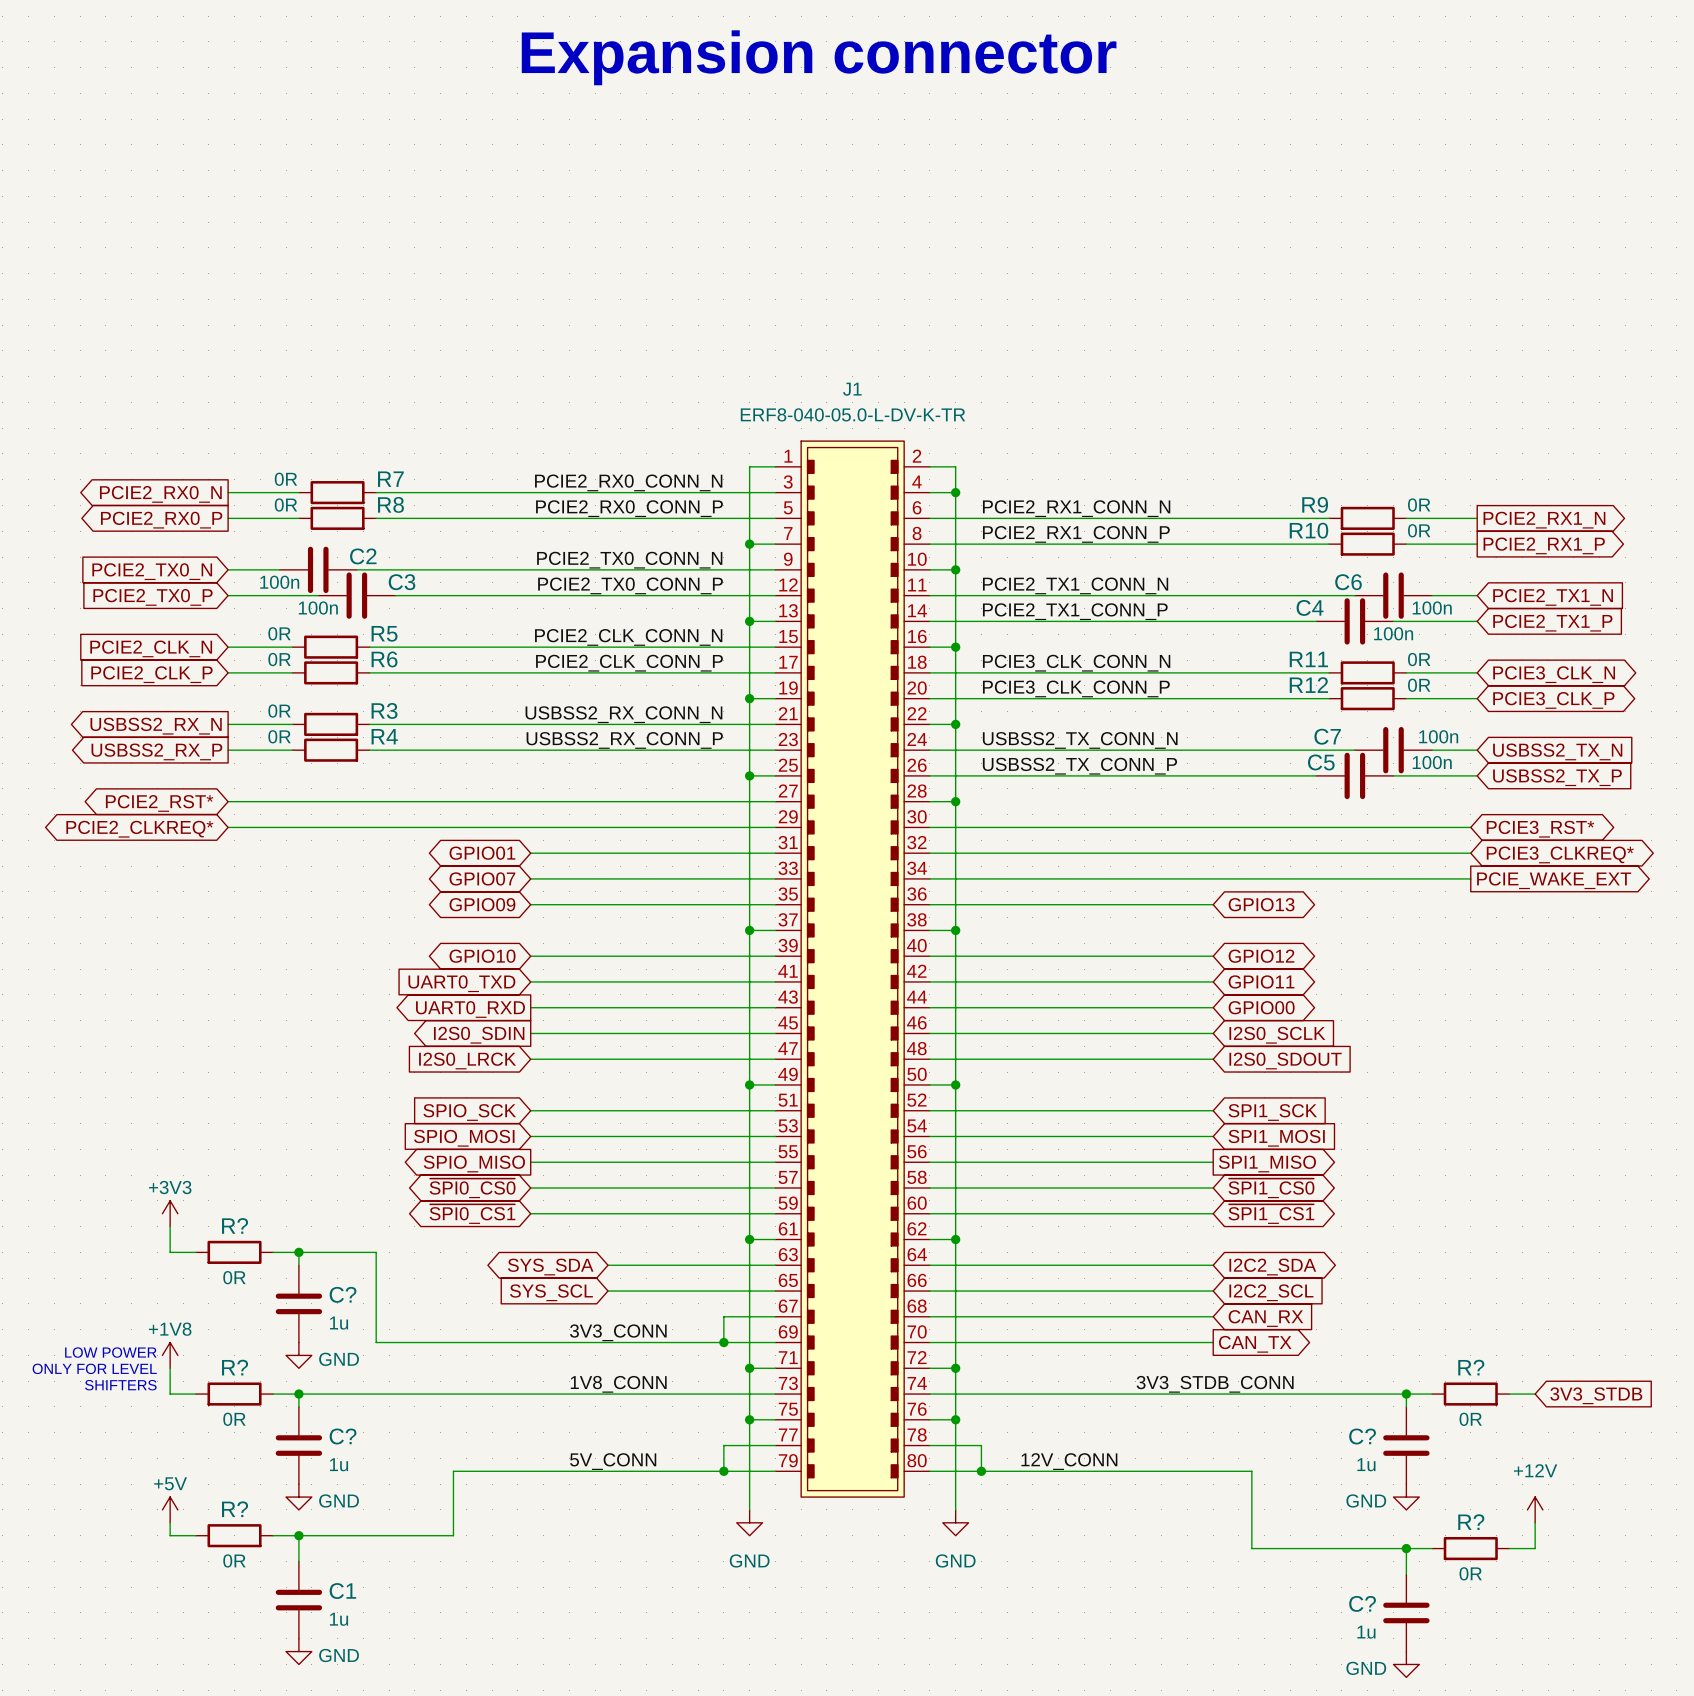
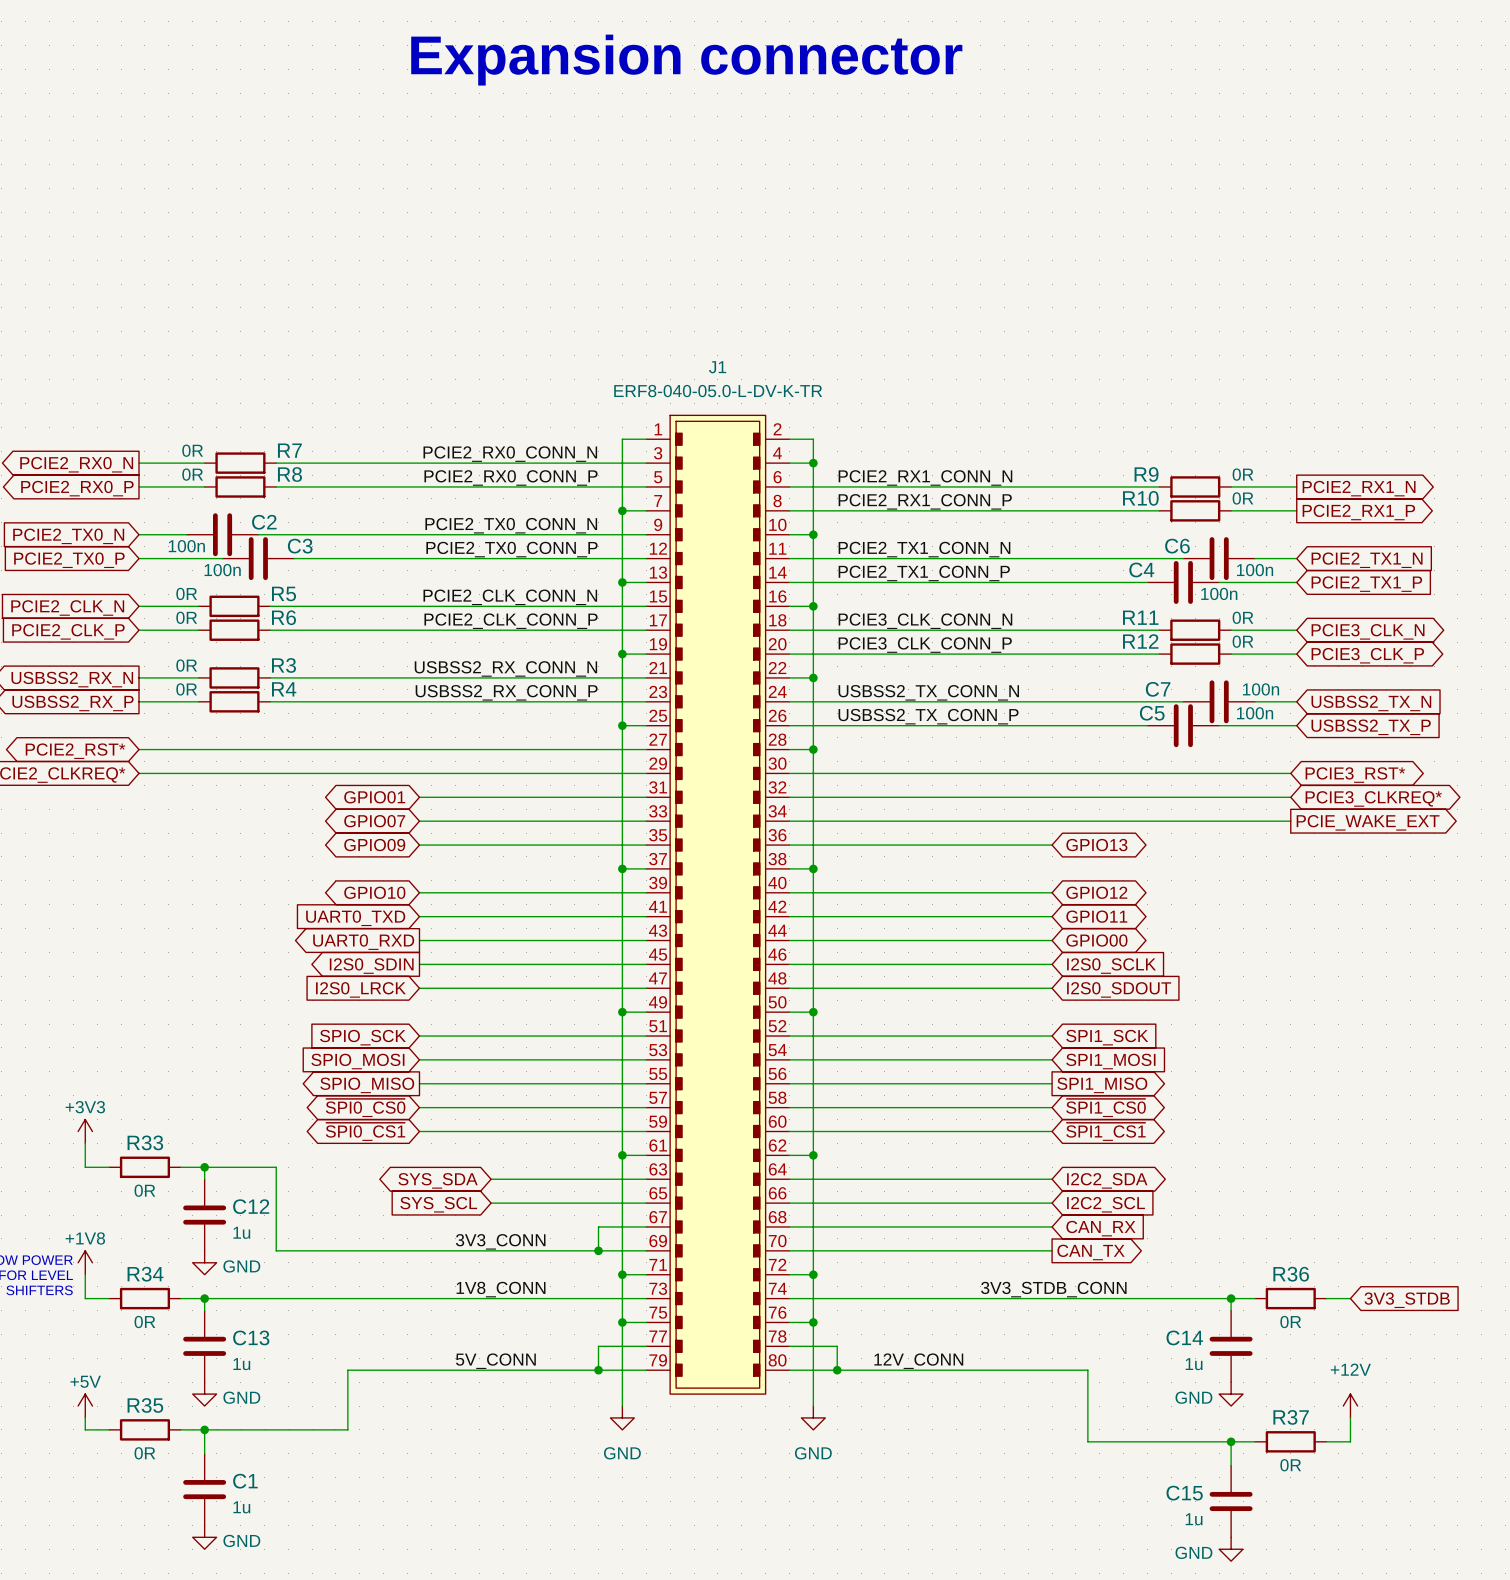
R? name: R? (235, 1225) -> R33 (145, 1142)
C? name: C? (343, 1294) -> C12 (251, 1206)
R? name: R? (235, 1367) -> R34 (145, 1274)
R? name: R? (1471, 1367) -> R36 (1291, 1274)
C? name: C? (343, 1436) -> C13 (251, 1337)
C? name: C? (1362, 1436) -> C14 (1184, 1337)
R? name: R? (235, 1509) -> R35 (145, 1405)
R? name: R? (1471, 1522) -> R37 (1291, 1417)
C? name: C? (1362, 1603) -> C15 (1184, 1493)

